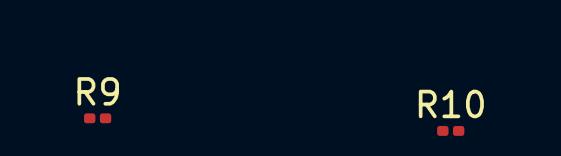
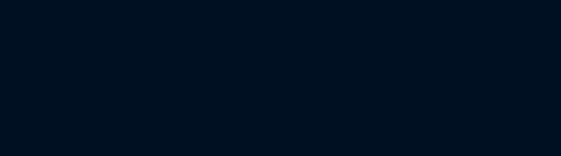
R9: (97, 118) -> none
R10: (450, 130) -> none

